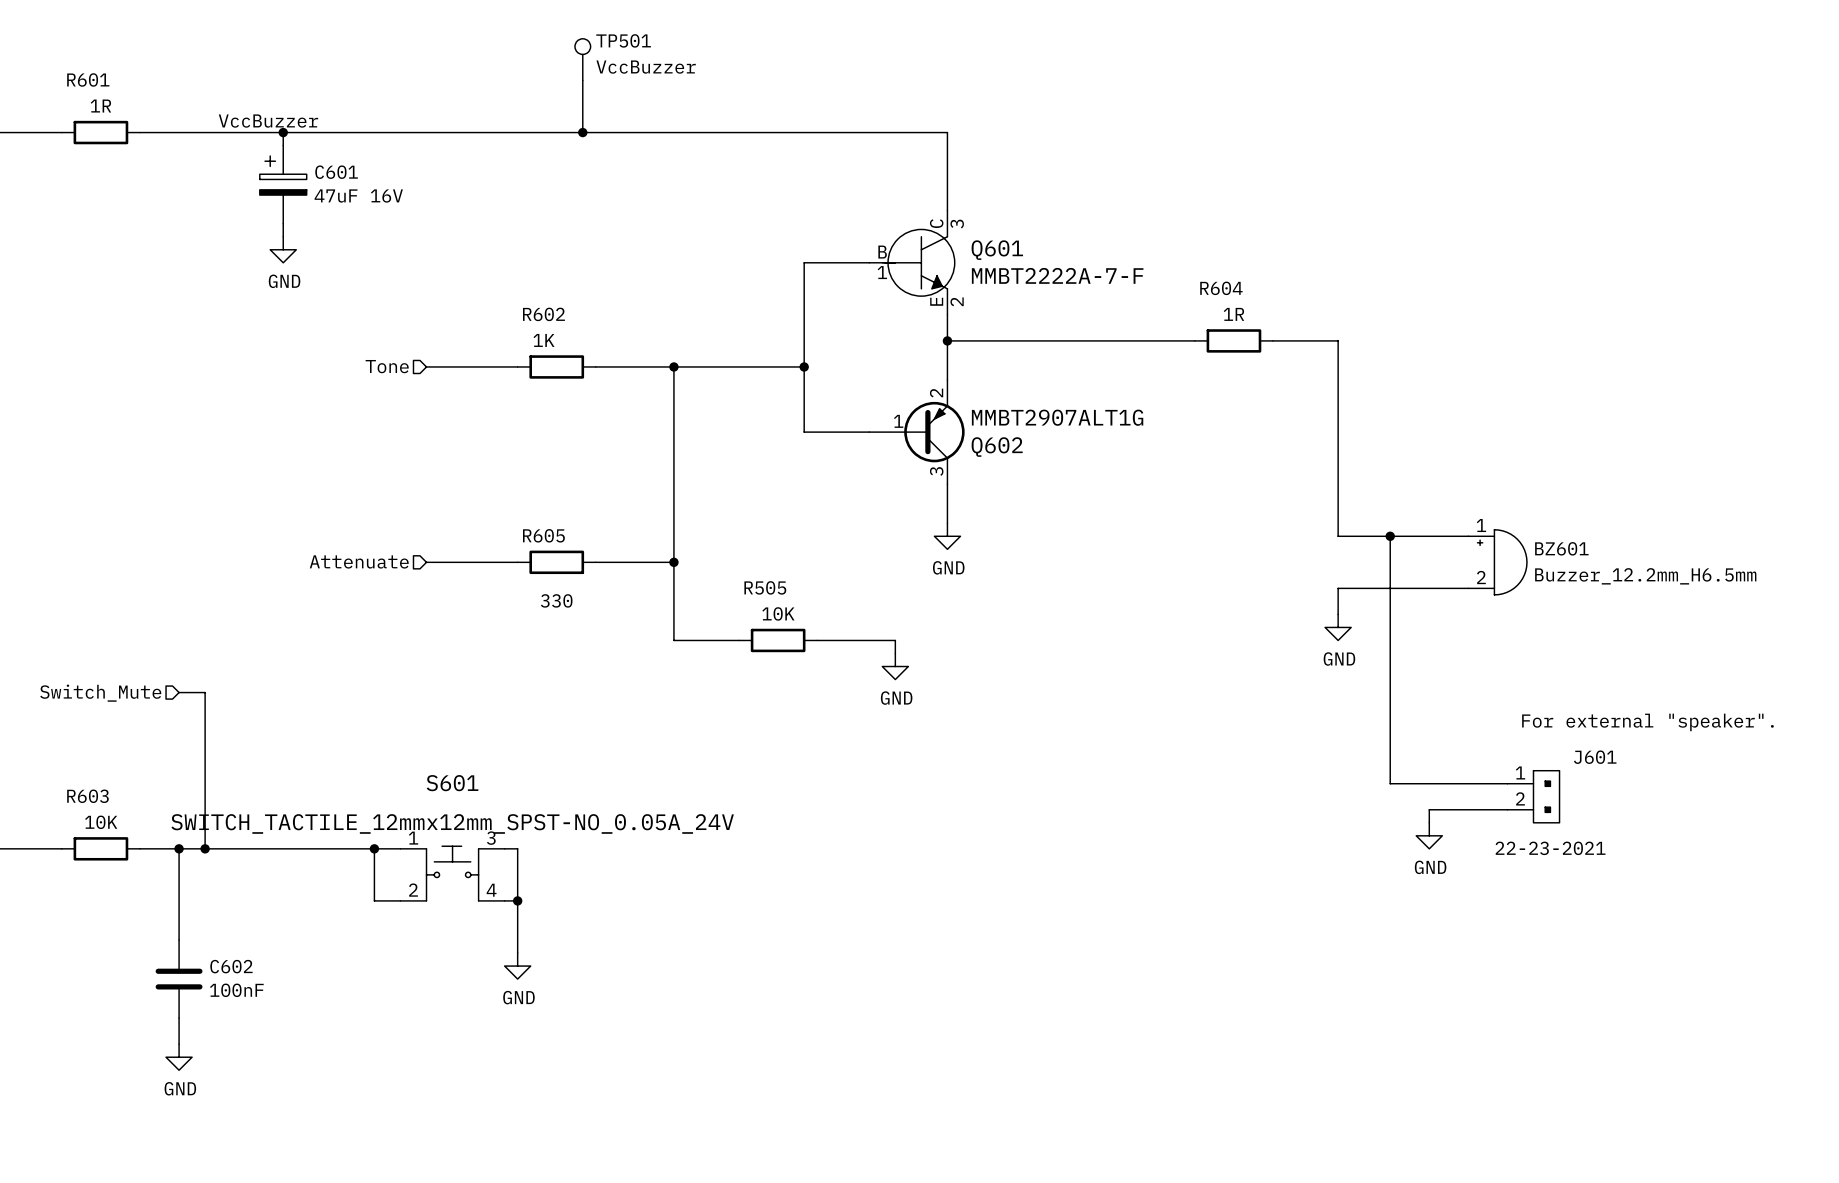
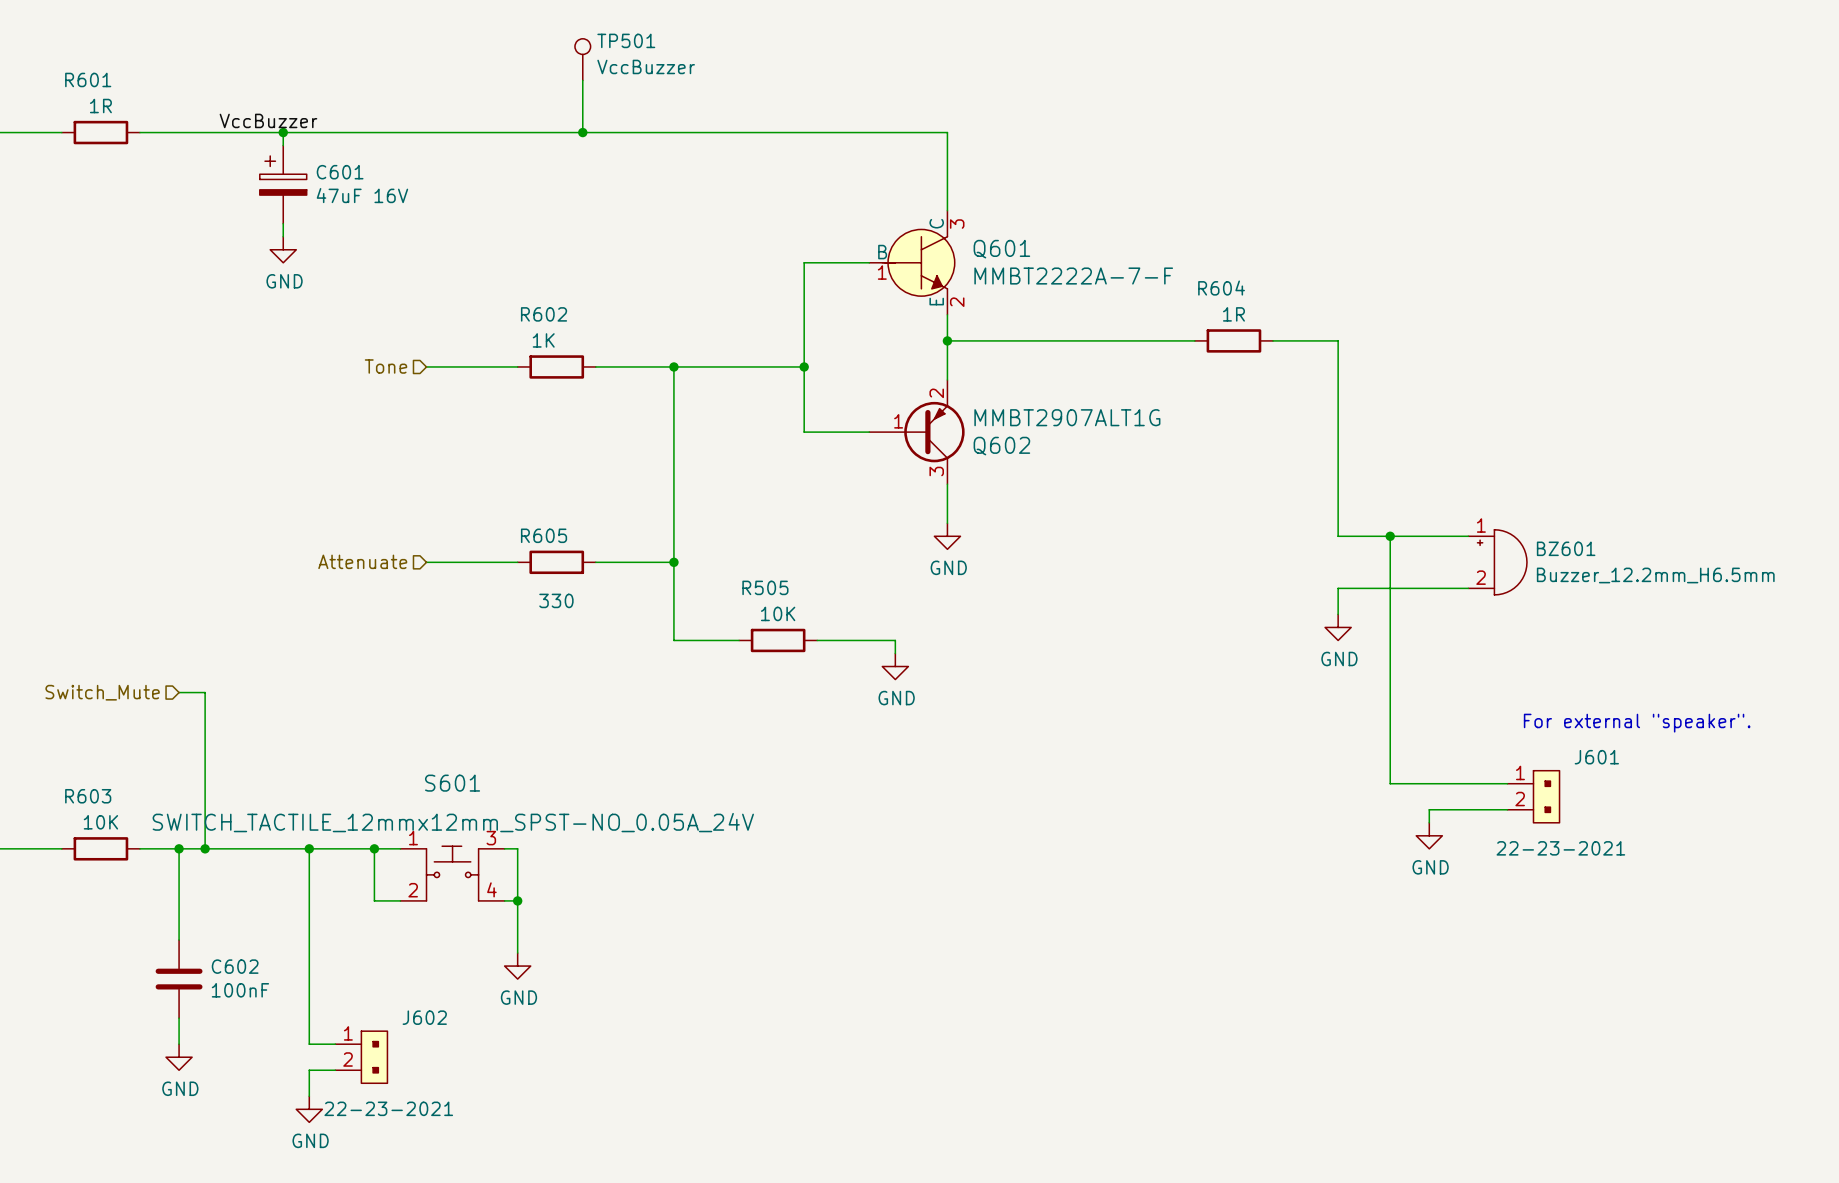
wire: none -> (309, 848) (309, 1044) (335, 1044)
junction: none -> (309, 848)
J602: none -> 22-23-2021 (361, 1057)
wire: none -> (335, 1070) (309, 1070) (309, 1096)
power symbol: none -> GND (309, 1109)

